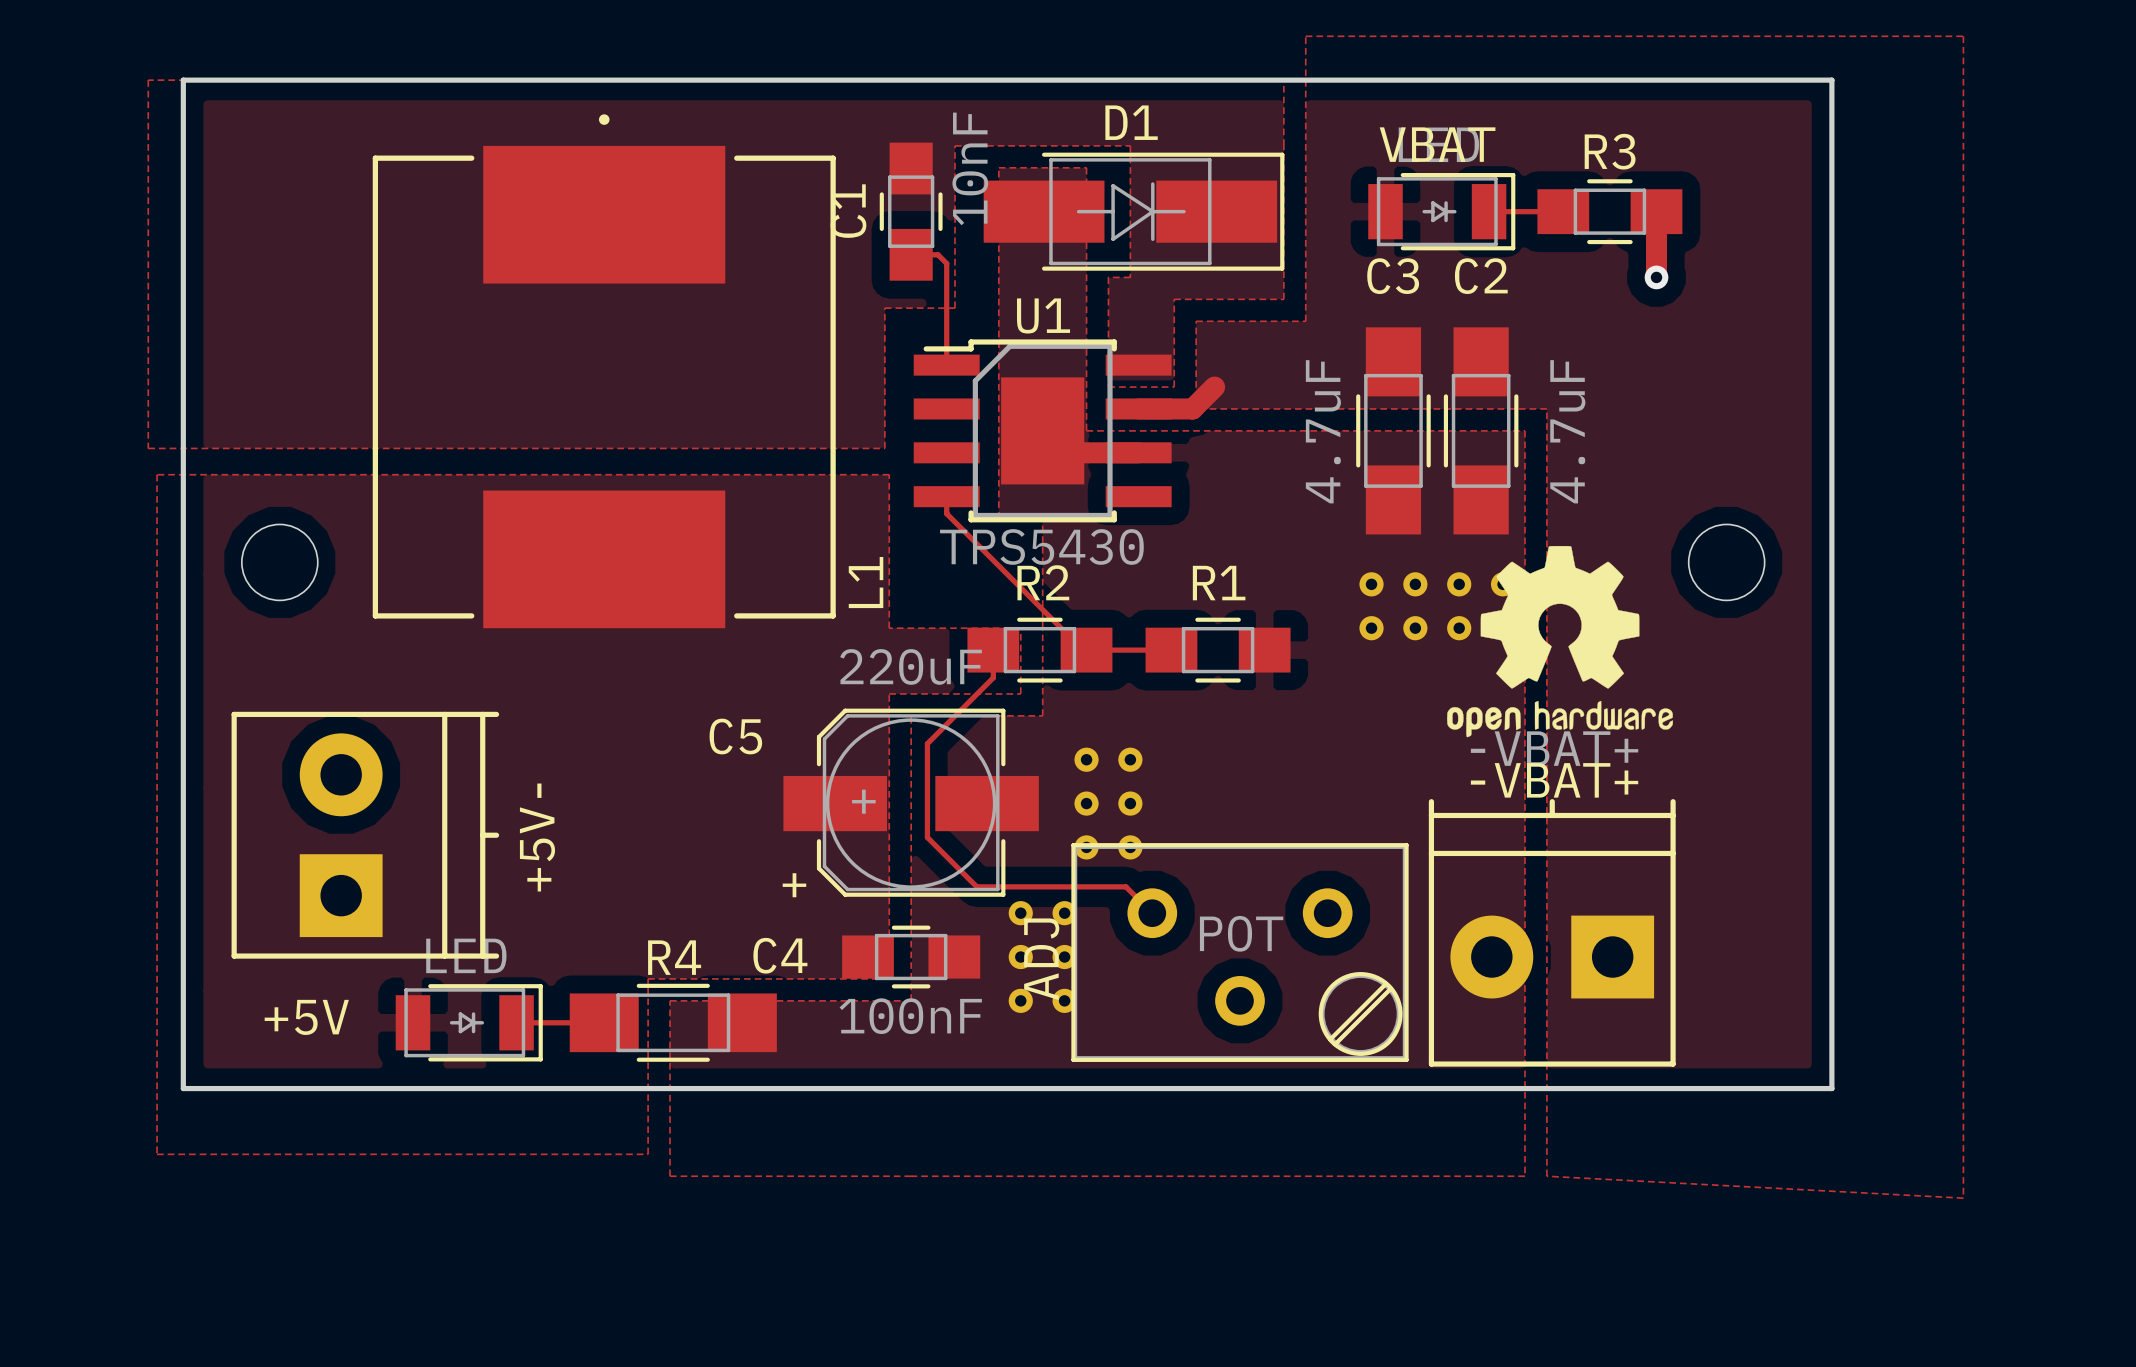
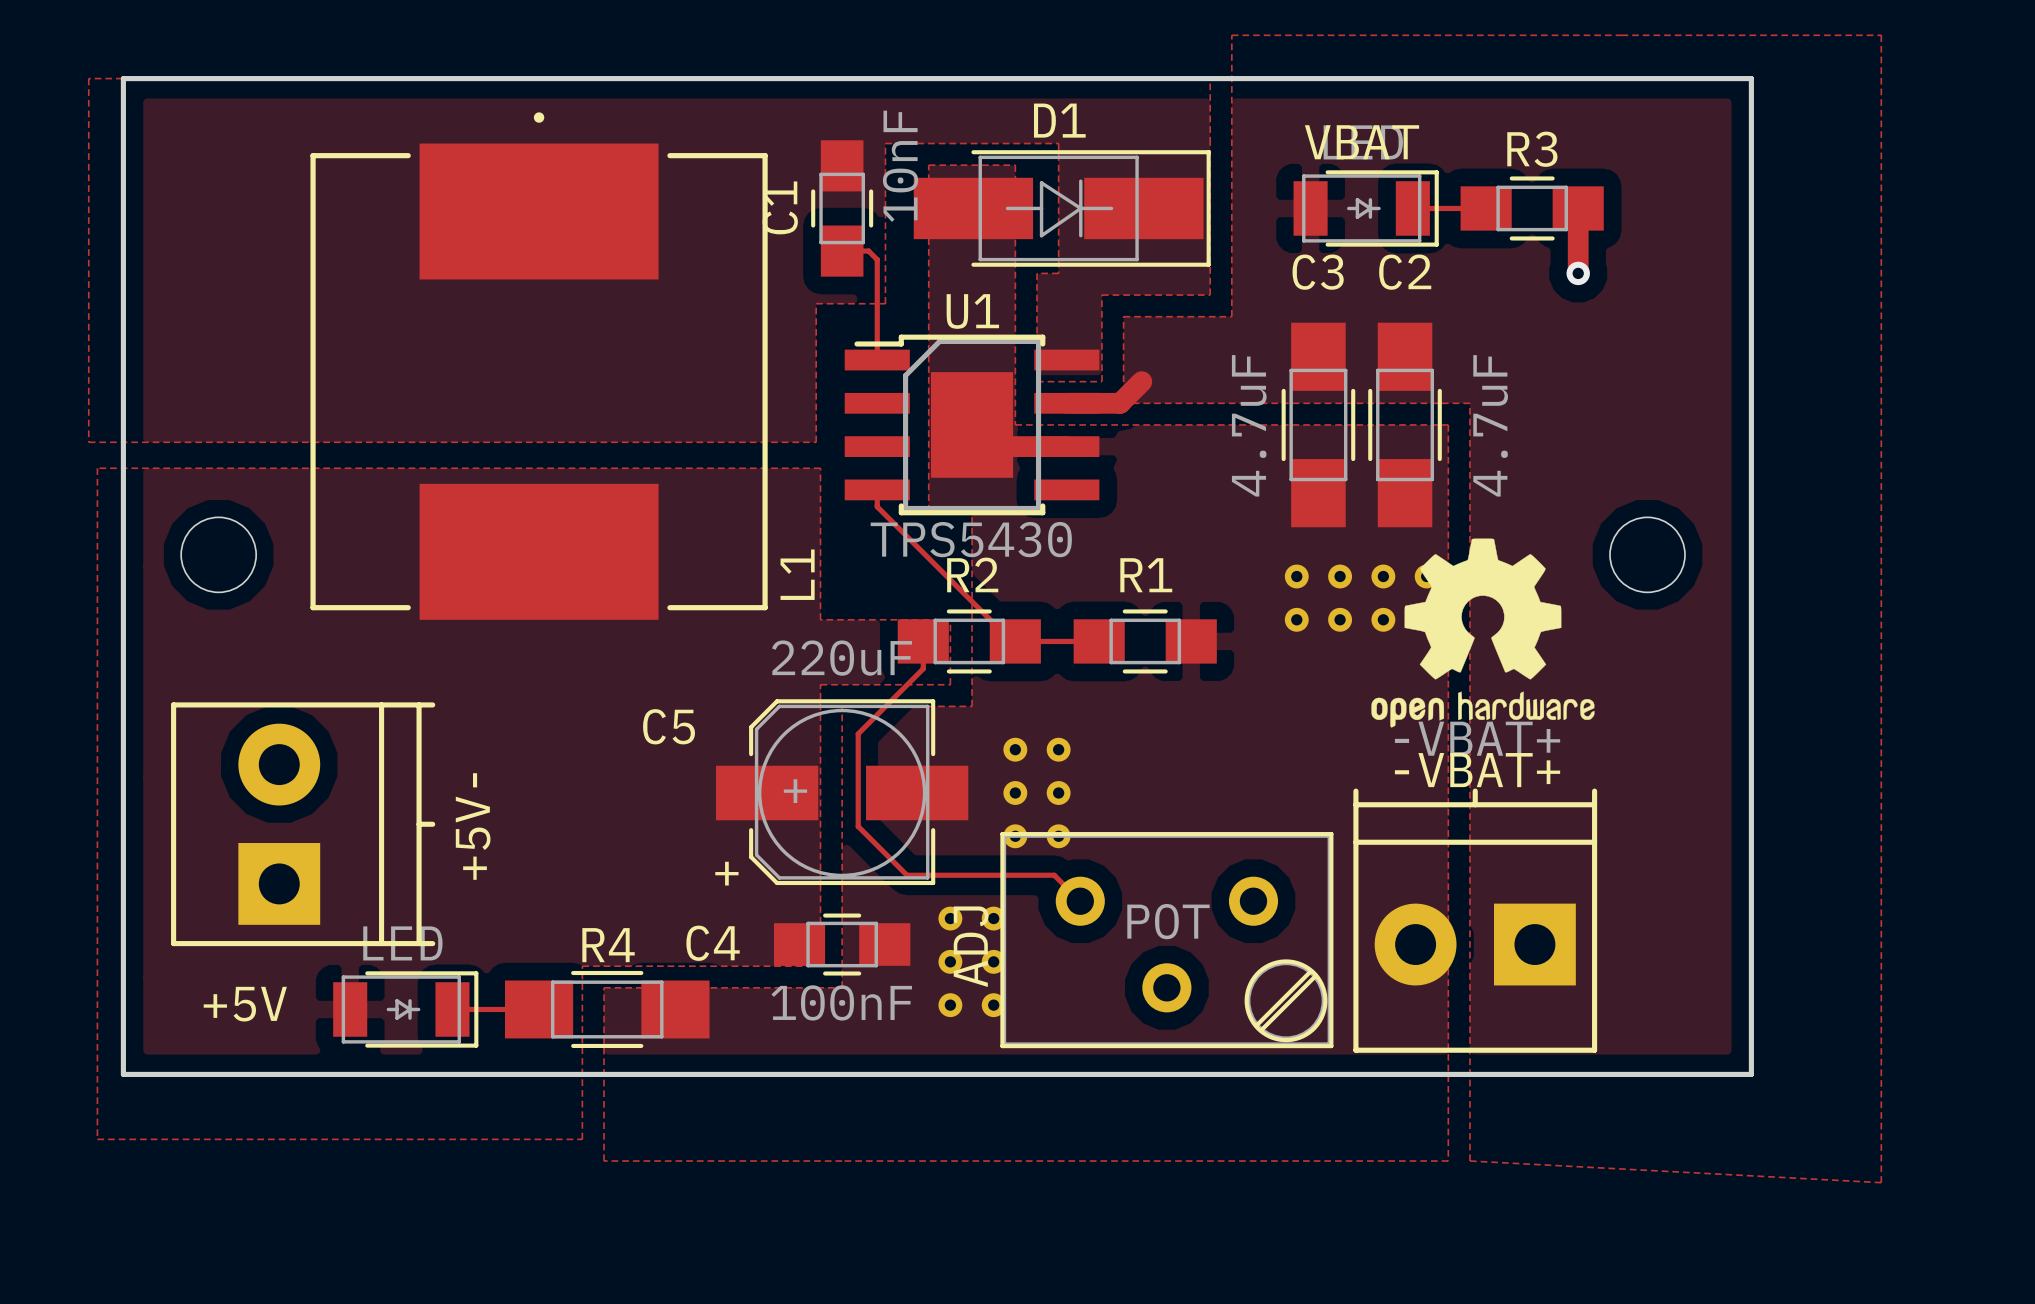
part: (1020, 913) -> none
part: (1064, 913) -> none
part: none -> (950, 918)
part: none -> (993, 918)
part: (1020, 957) -> none
part: (1064, 957) -> none
part: none -> (950, 961)
part: none -> (993, 961)
part: (1020, 1000) -> none
part: (1064, 1000) -> none
part: none -> (950, 1005)
part: none -> (993, 1005)

